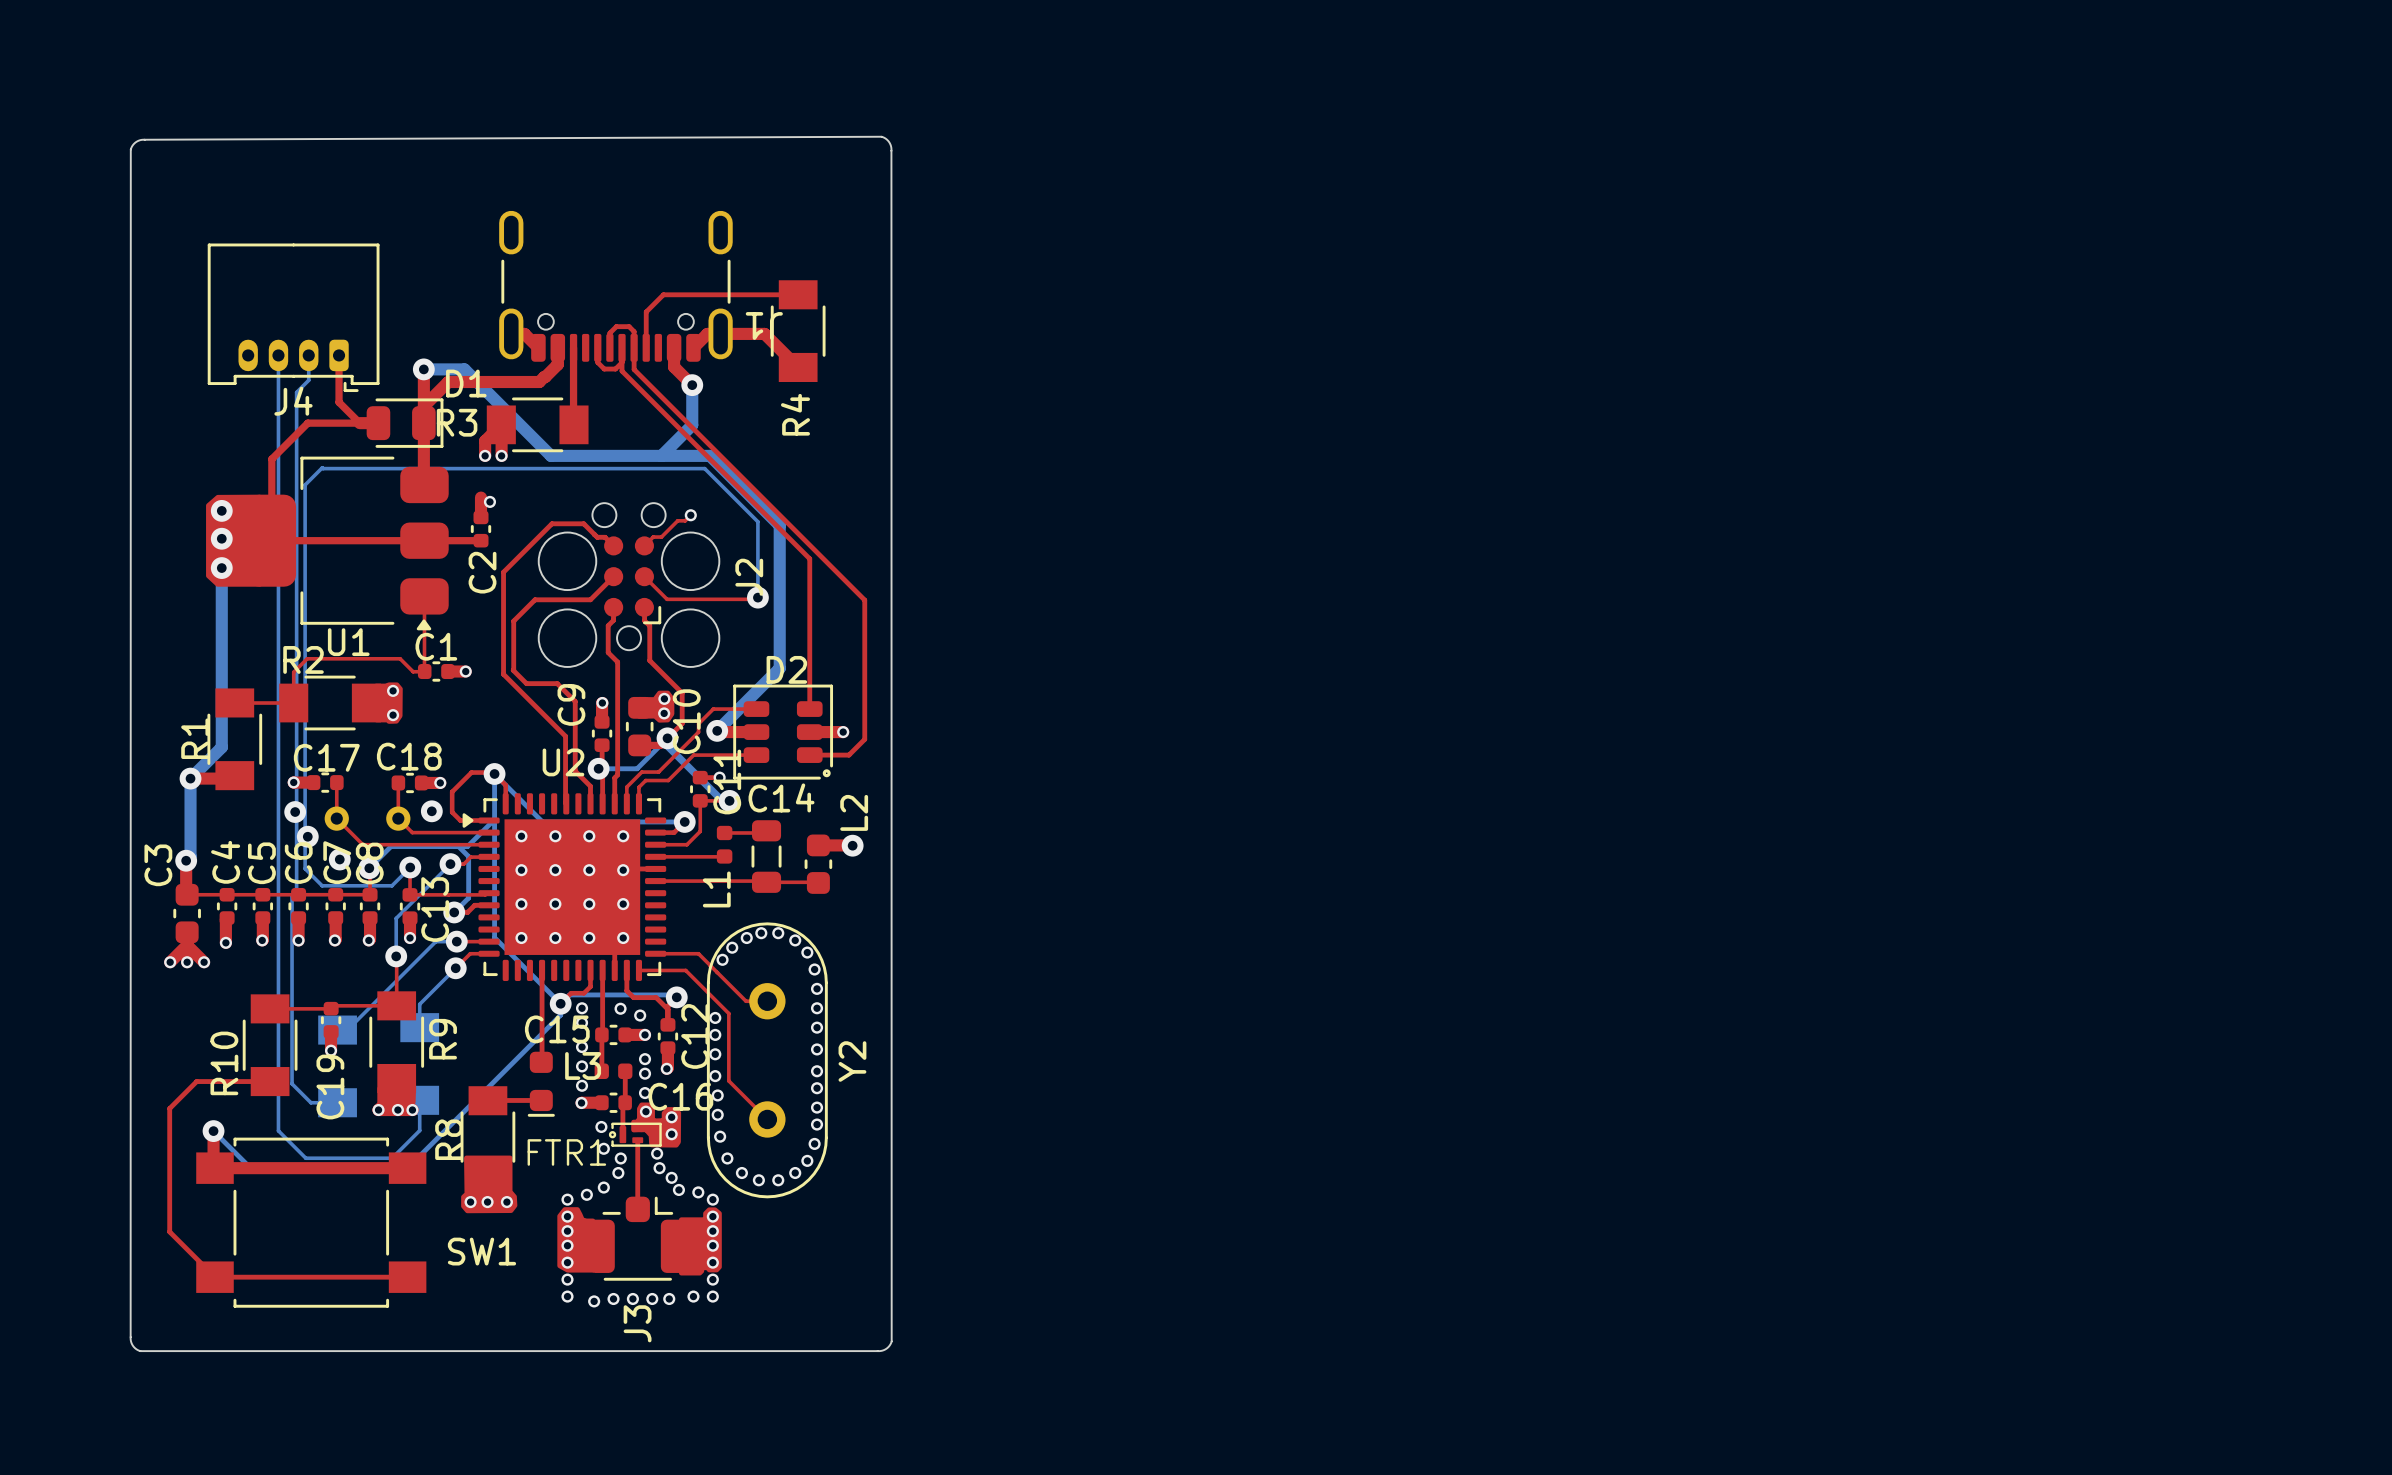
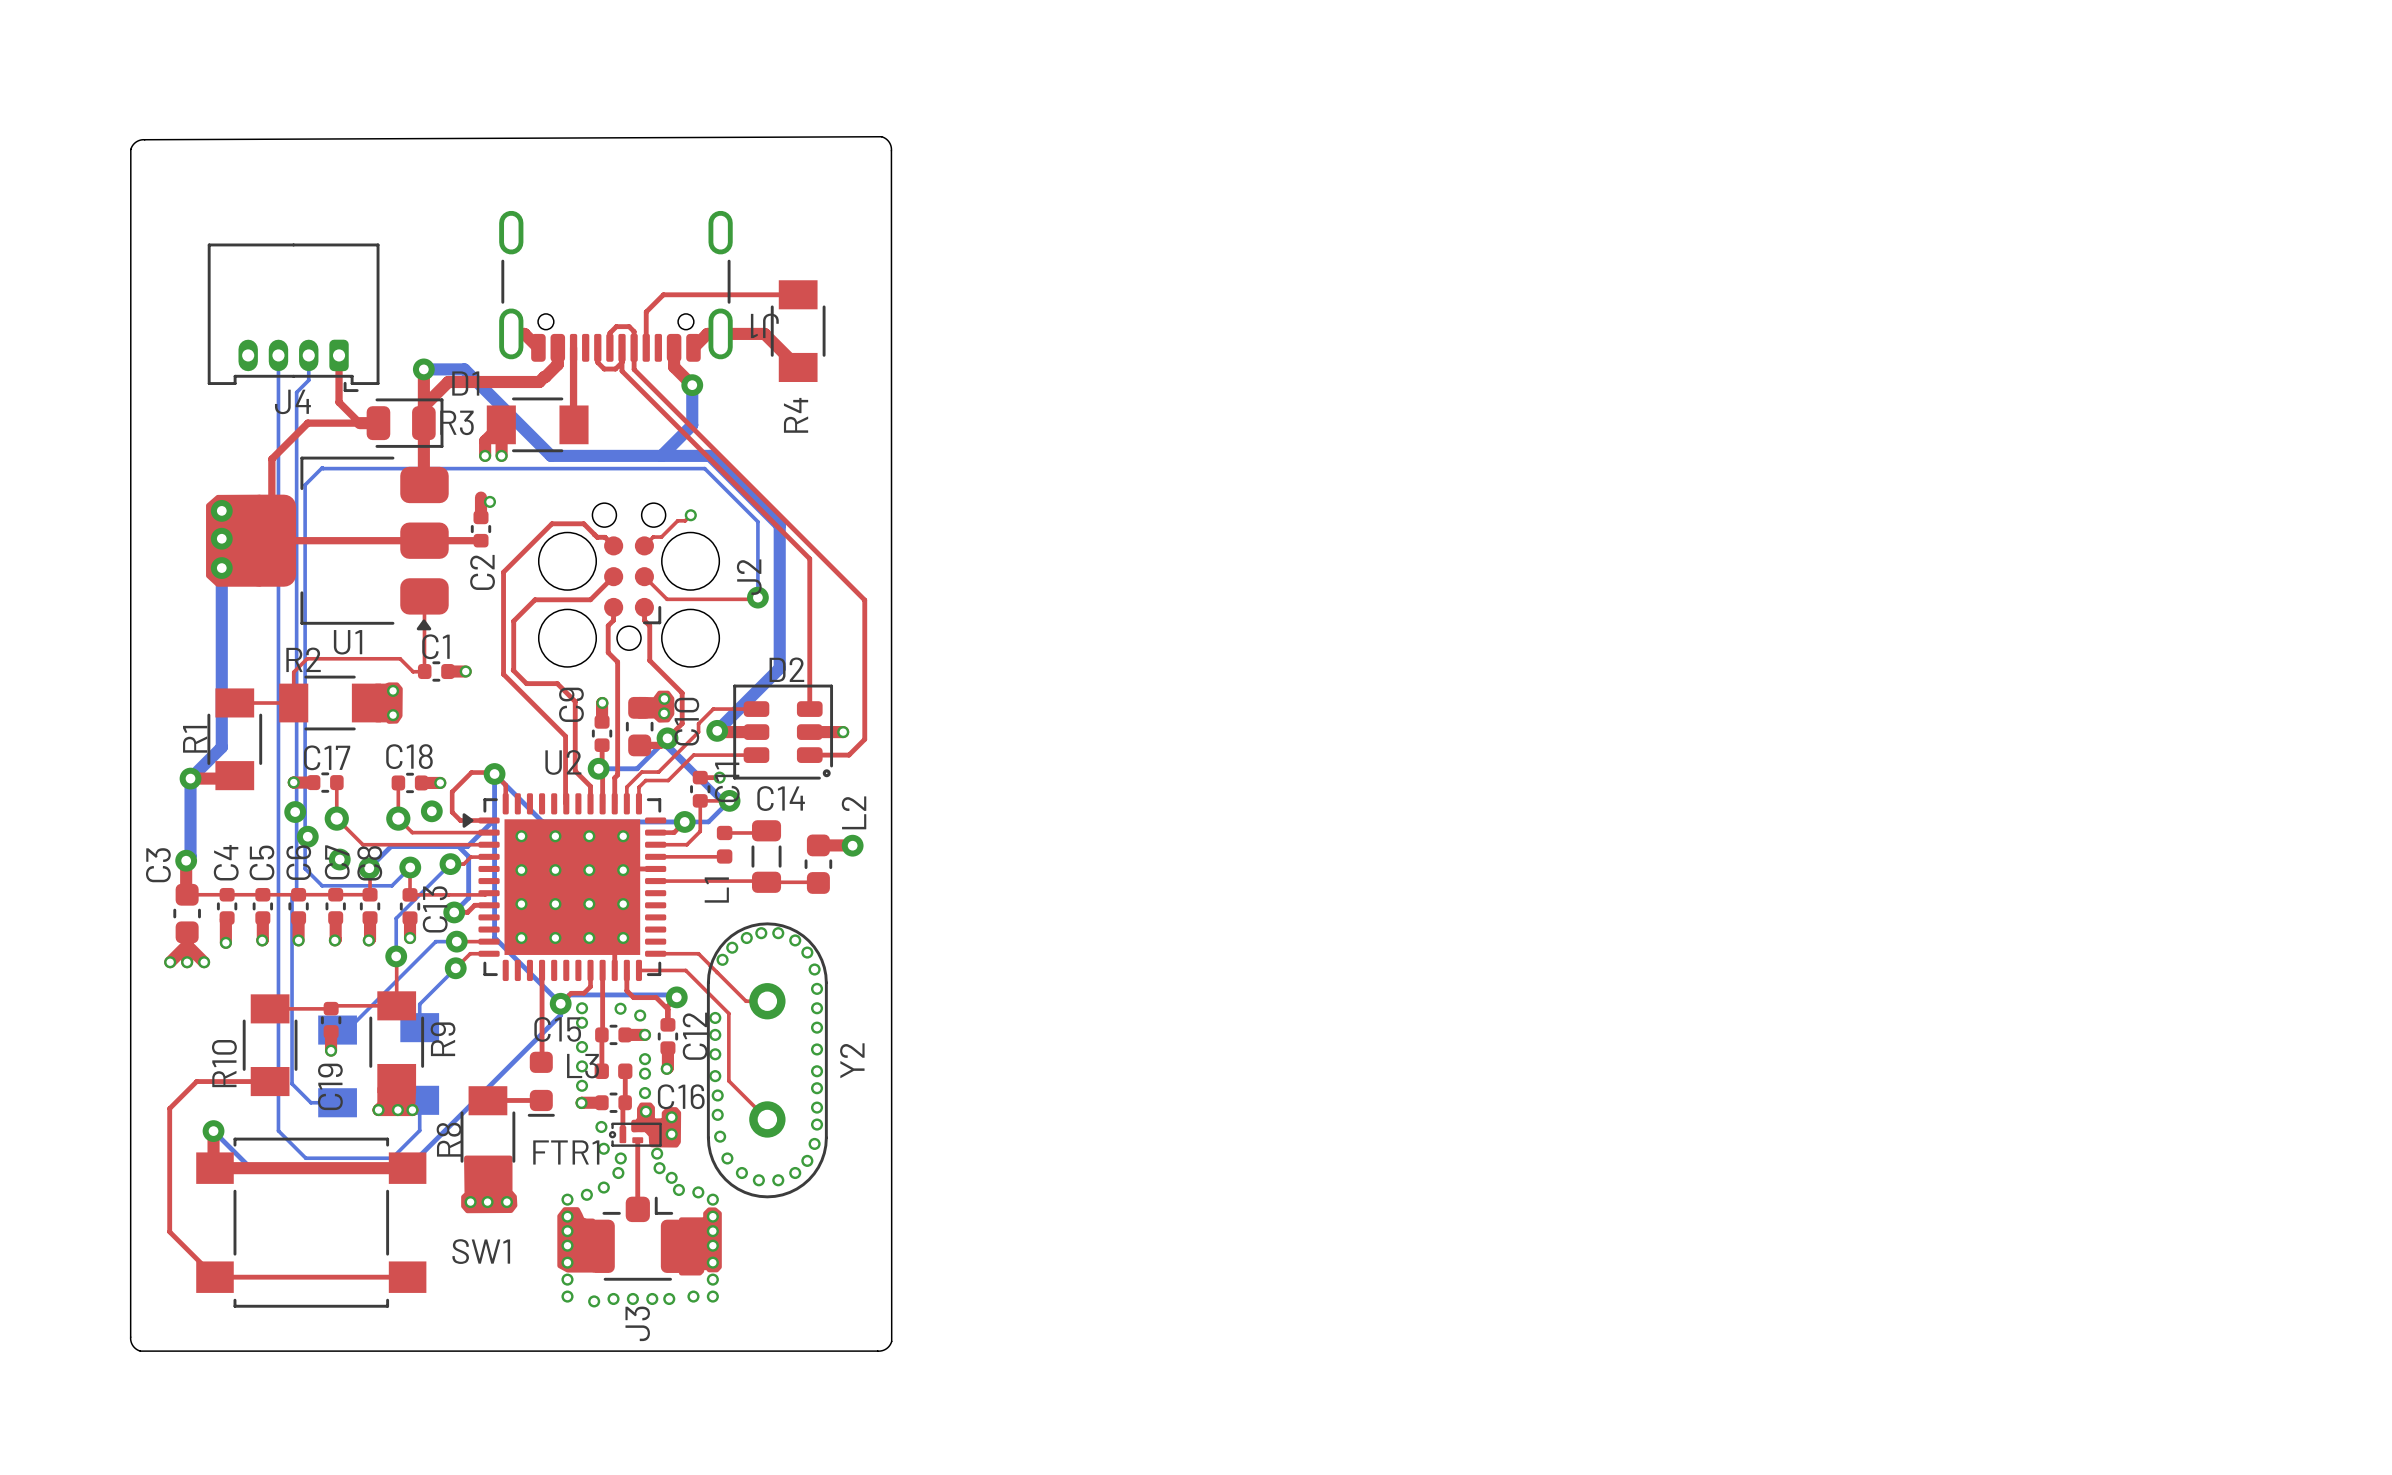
bottom track: none -> (729, 800) (708, 821) (684, 821)

